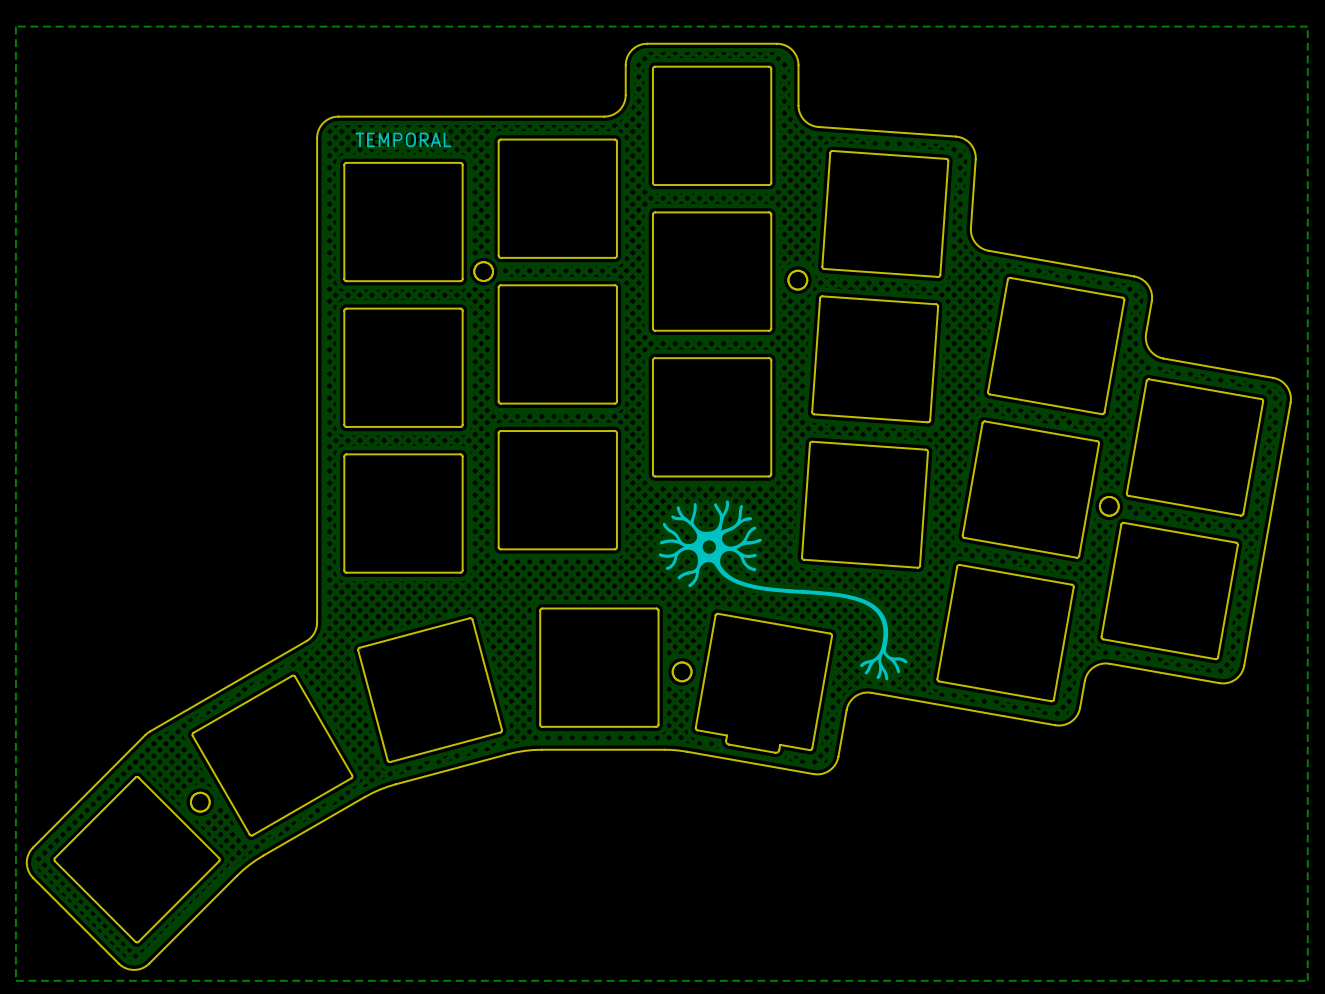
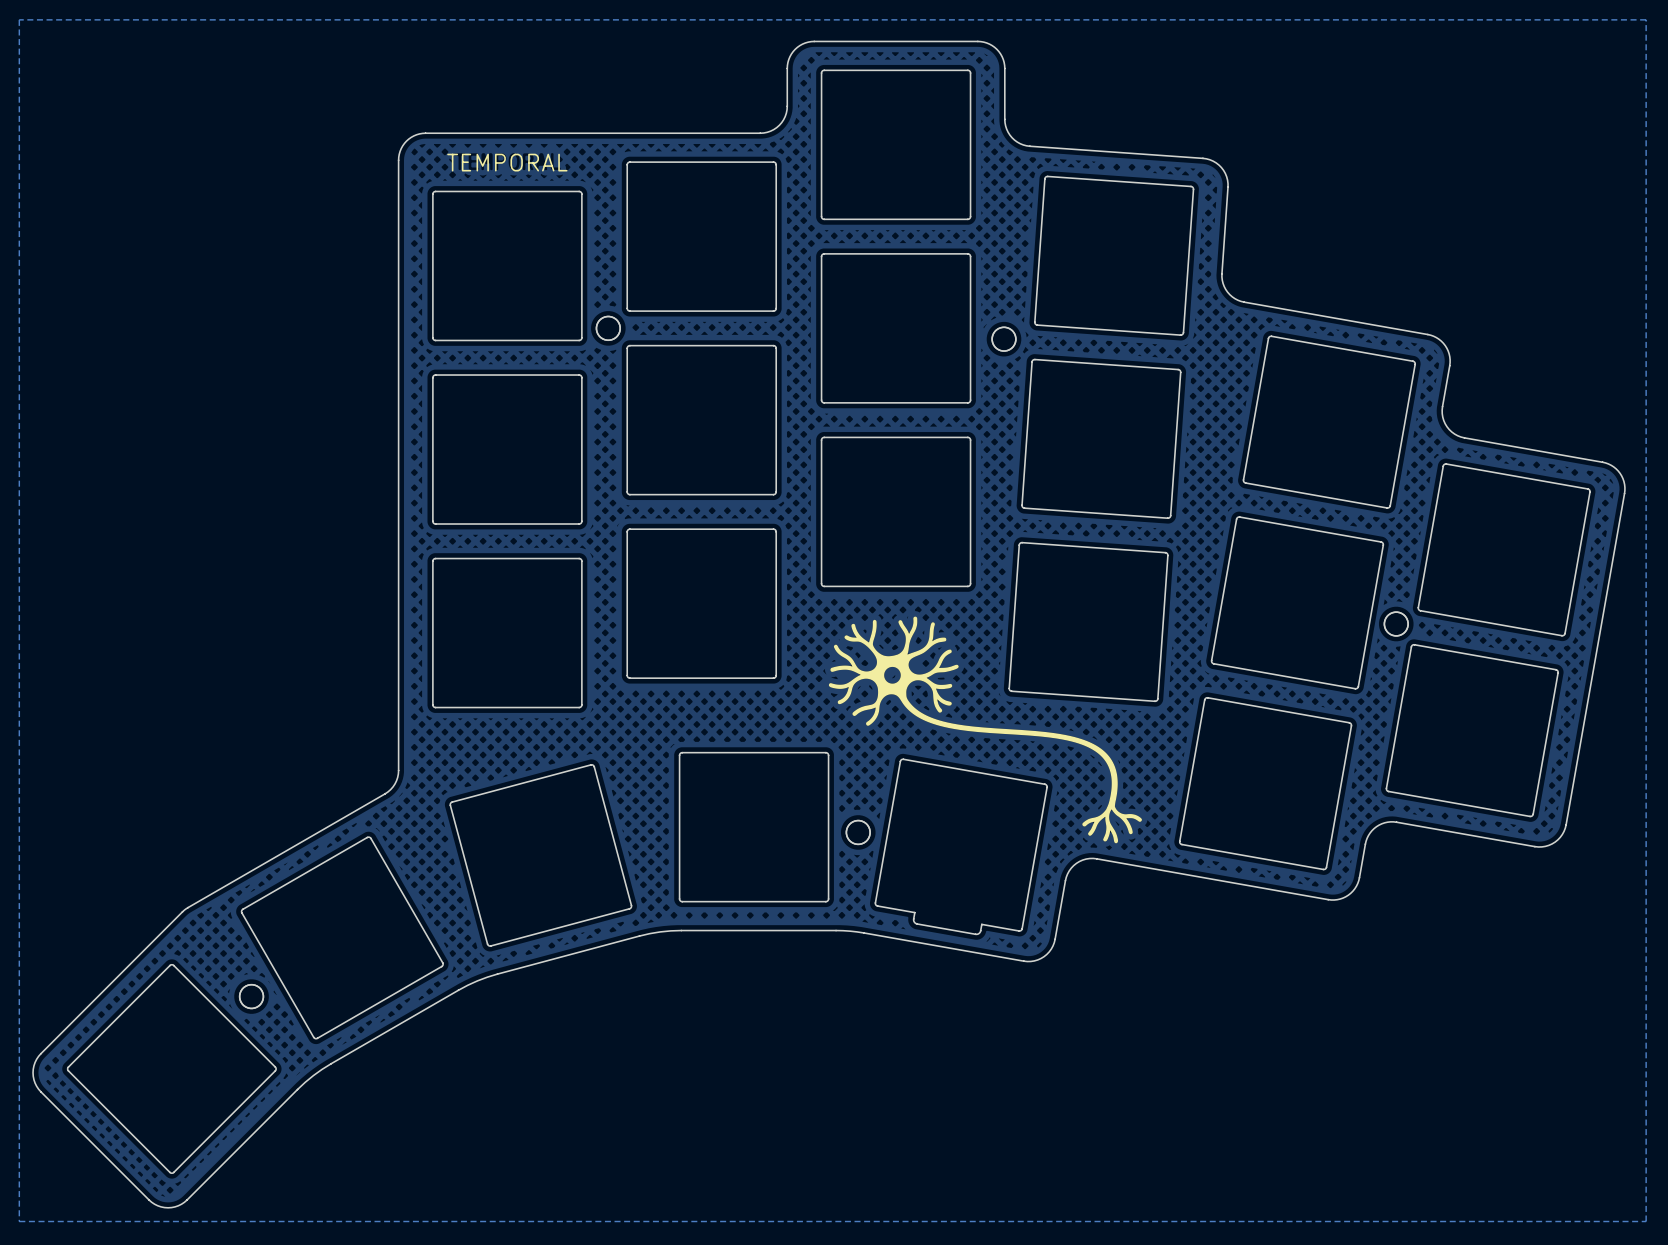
drawing shape: [658, 500, 908, 681] -> [828, 616, 1142, 844]

